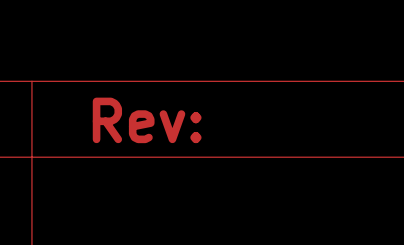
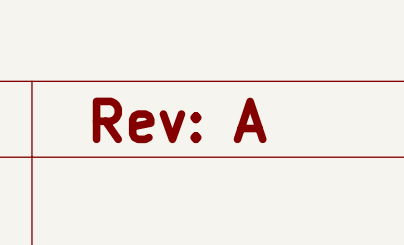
title block: Rev: (147, 120) -> Rev: A (179, 120)

